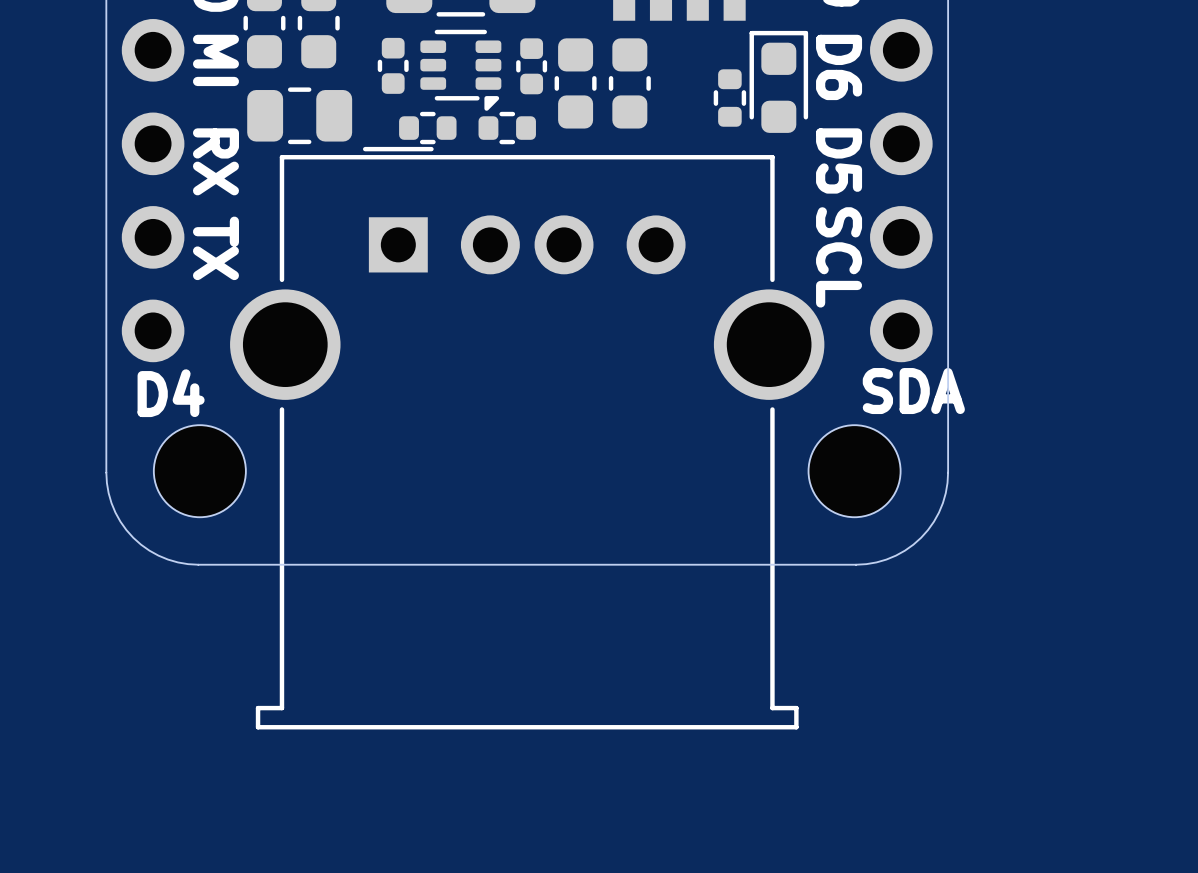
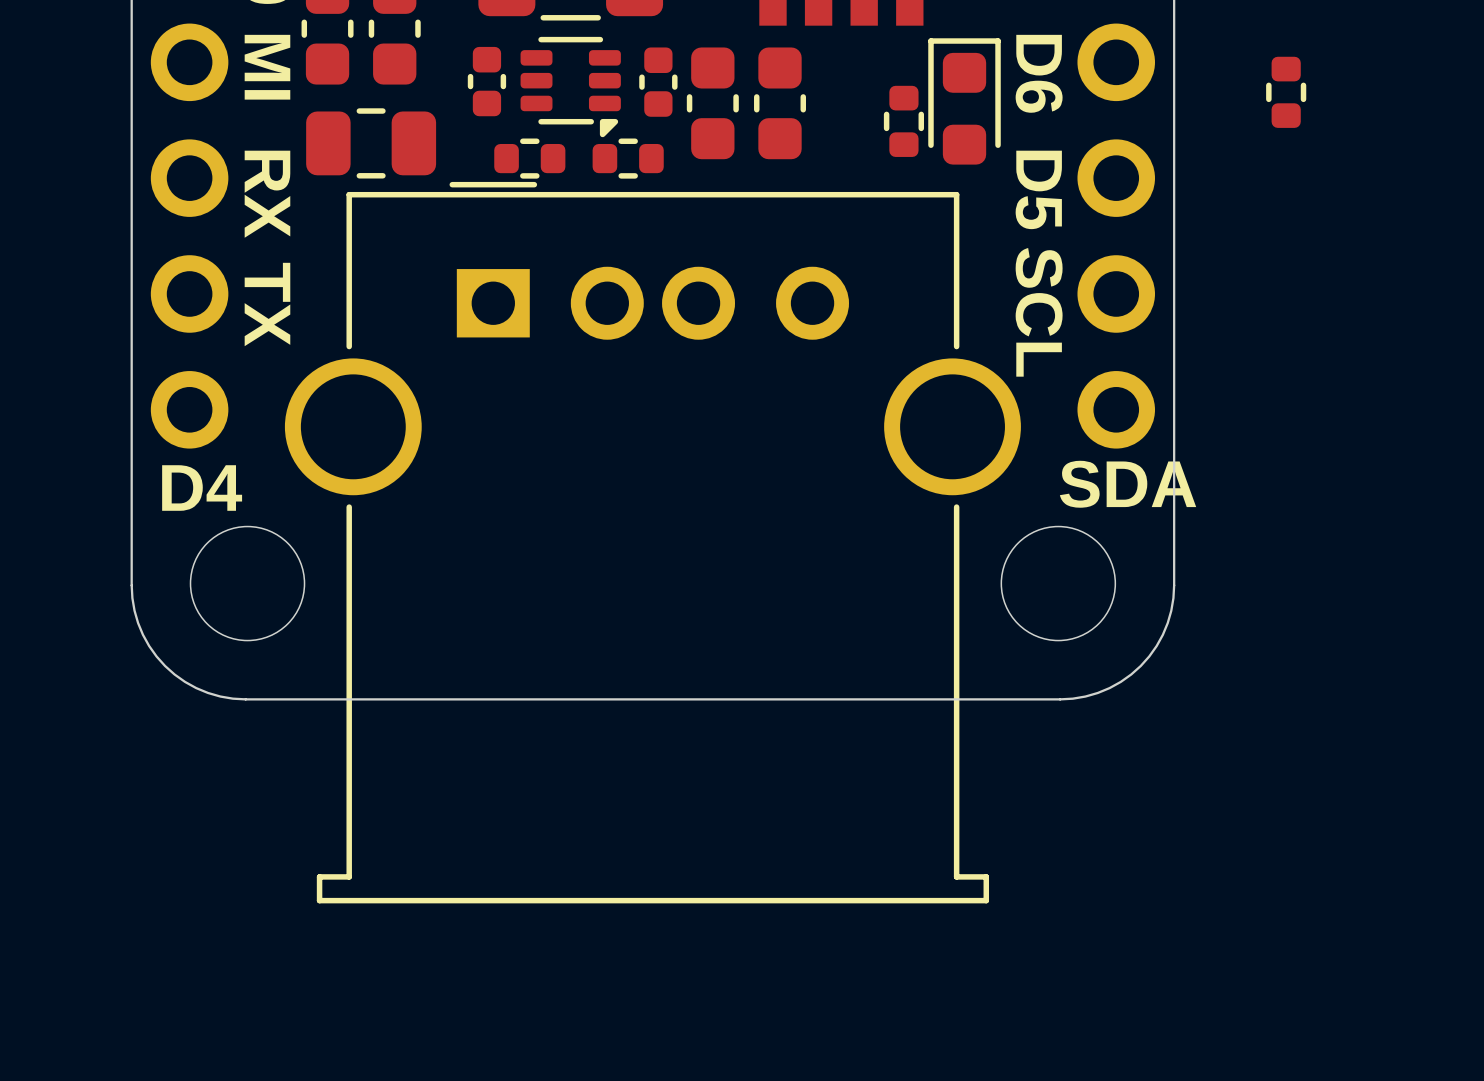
part: none -> (1286, 92)

